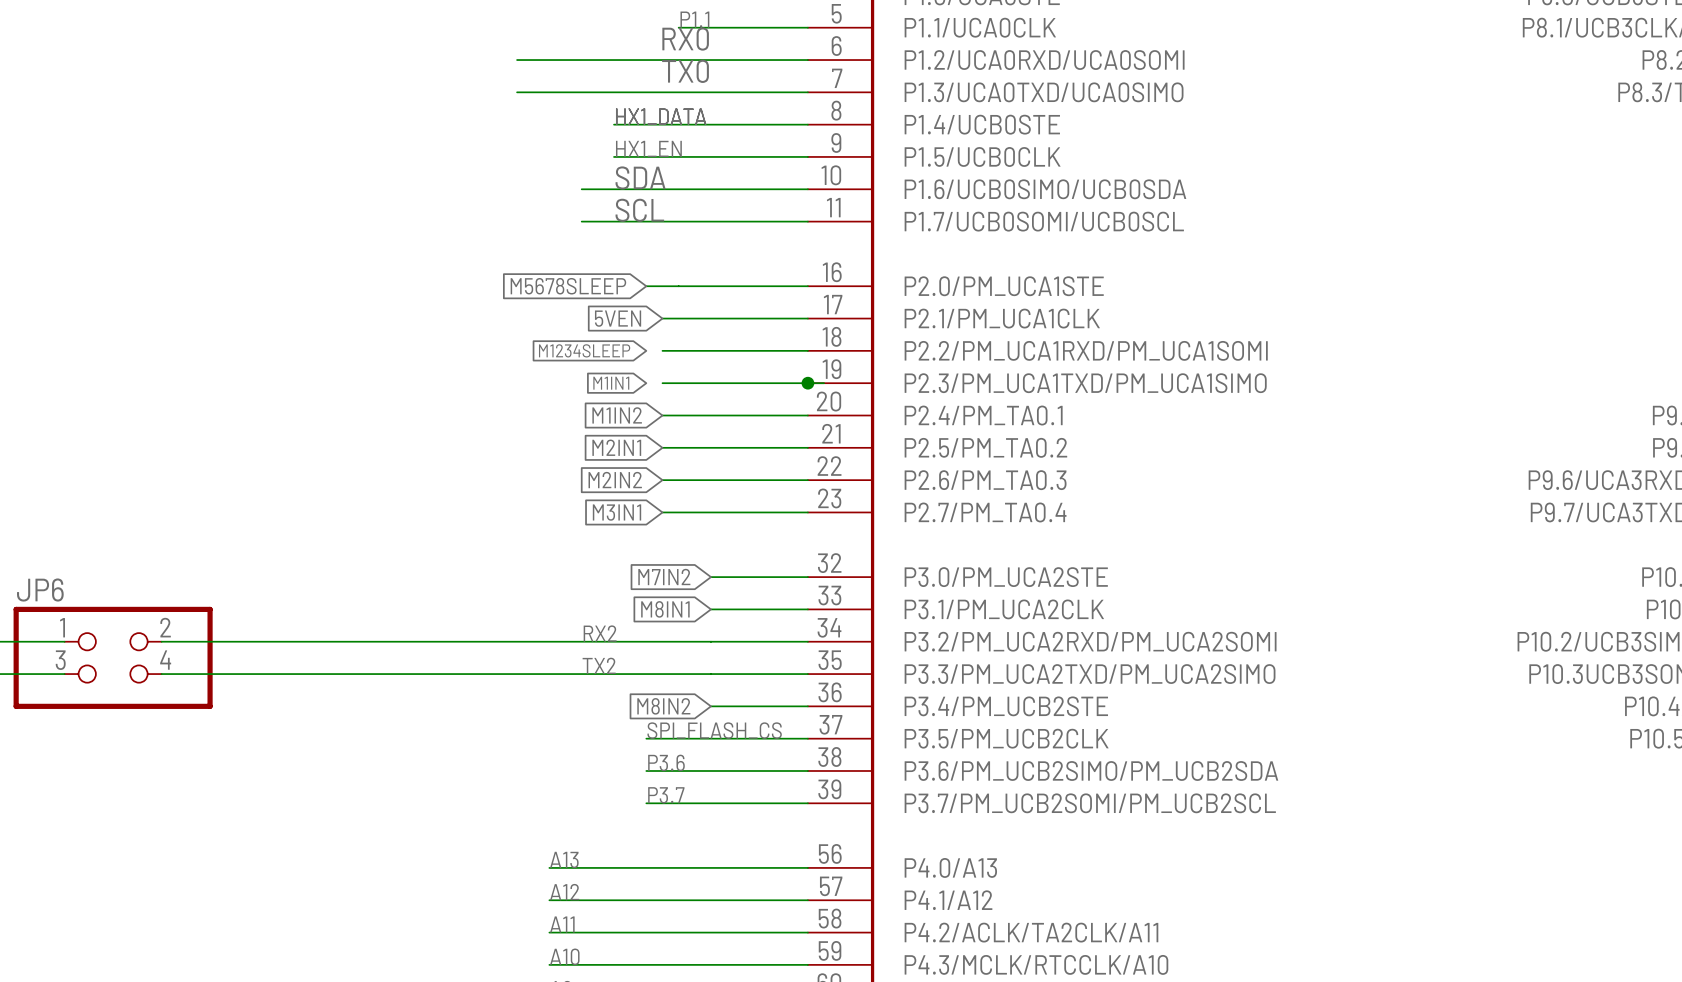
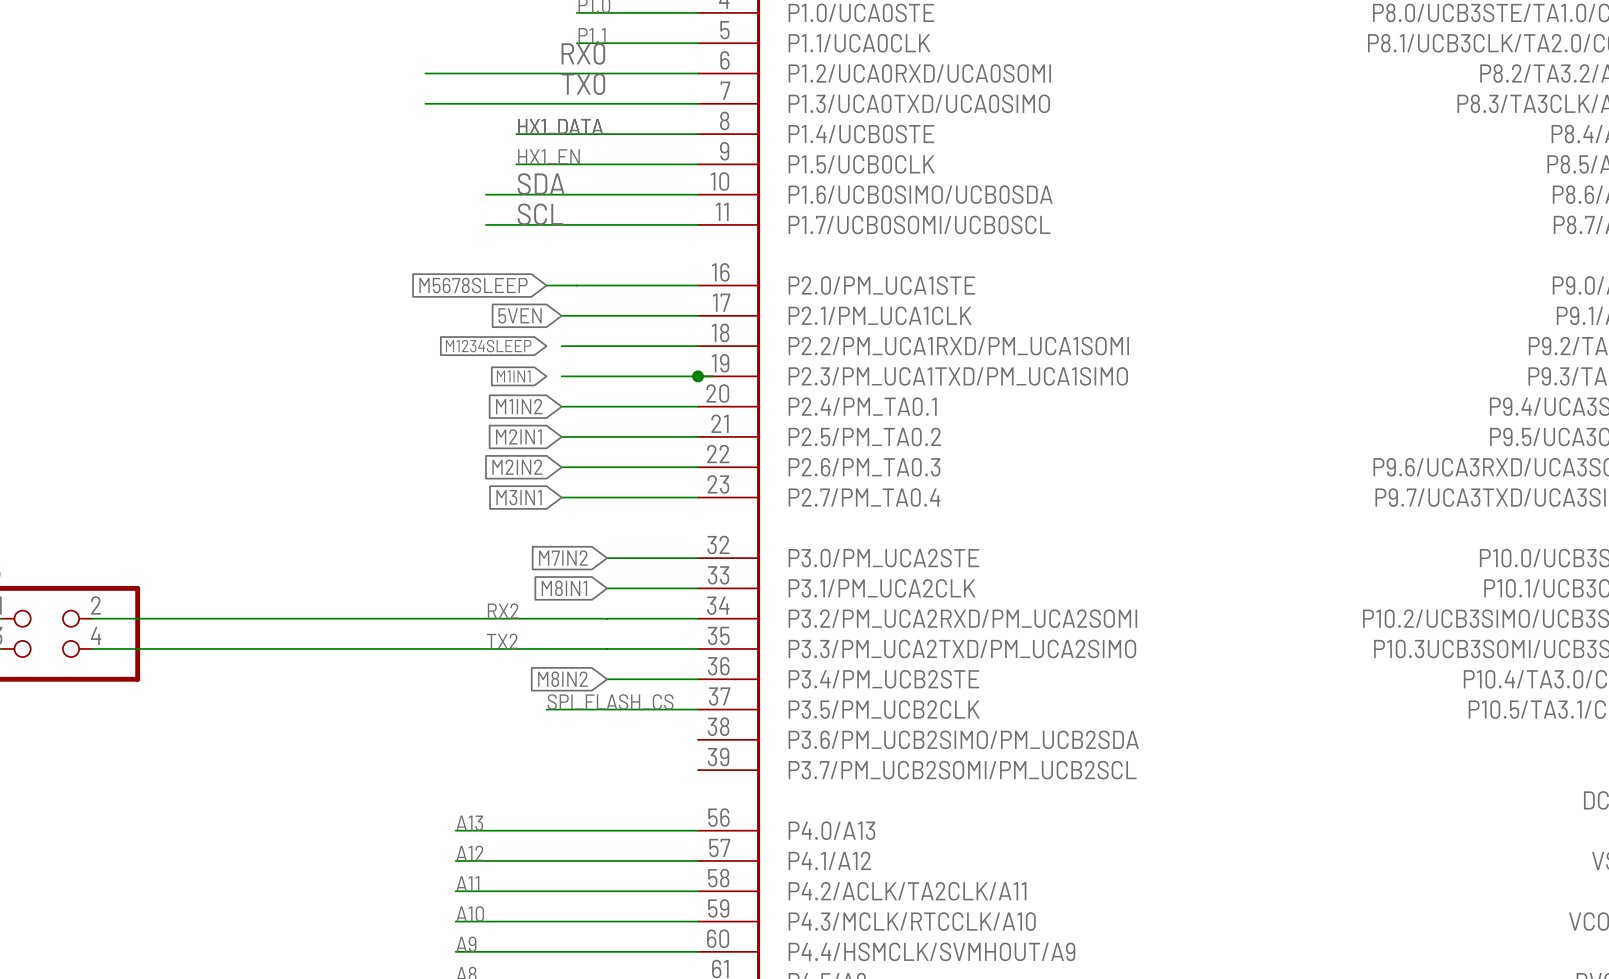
label: P3.6 (666, 762) -> none
wire: (646, 770) (807, 770) -> none
label: P3.7 (666, 795) -> none
wire: (646, 803) (807, 803) -> none

